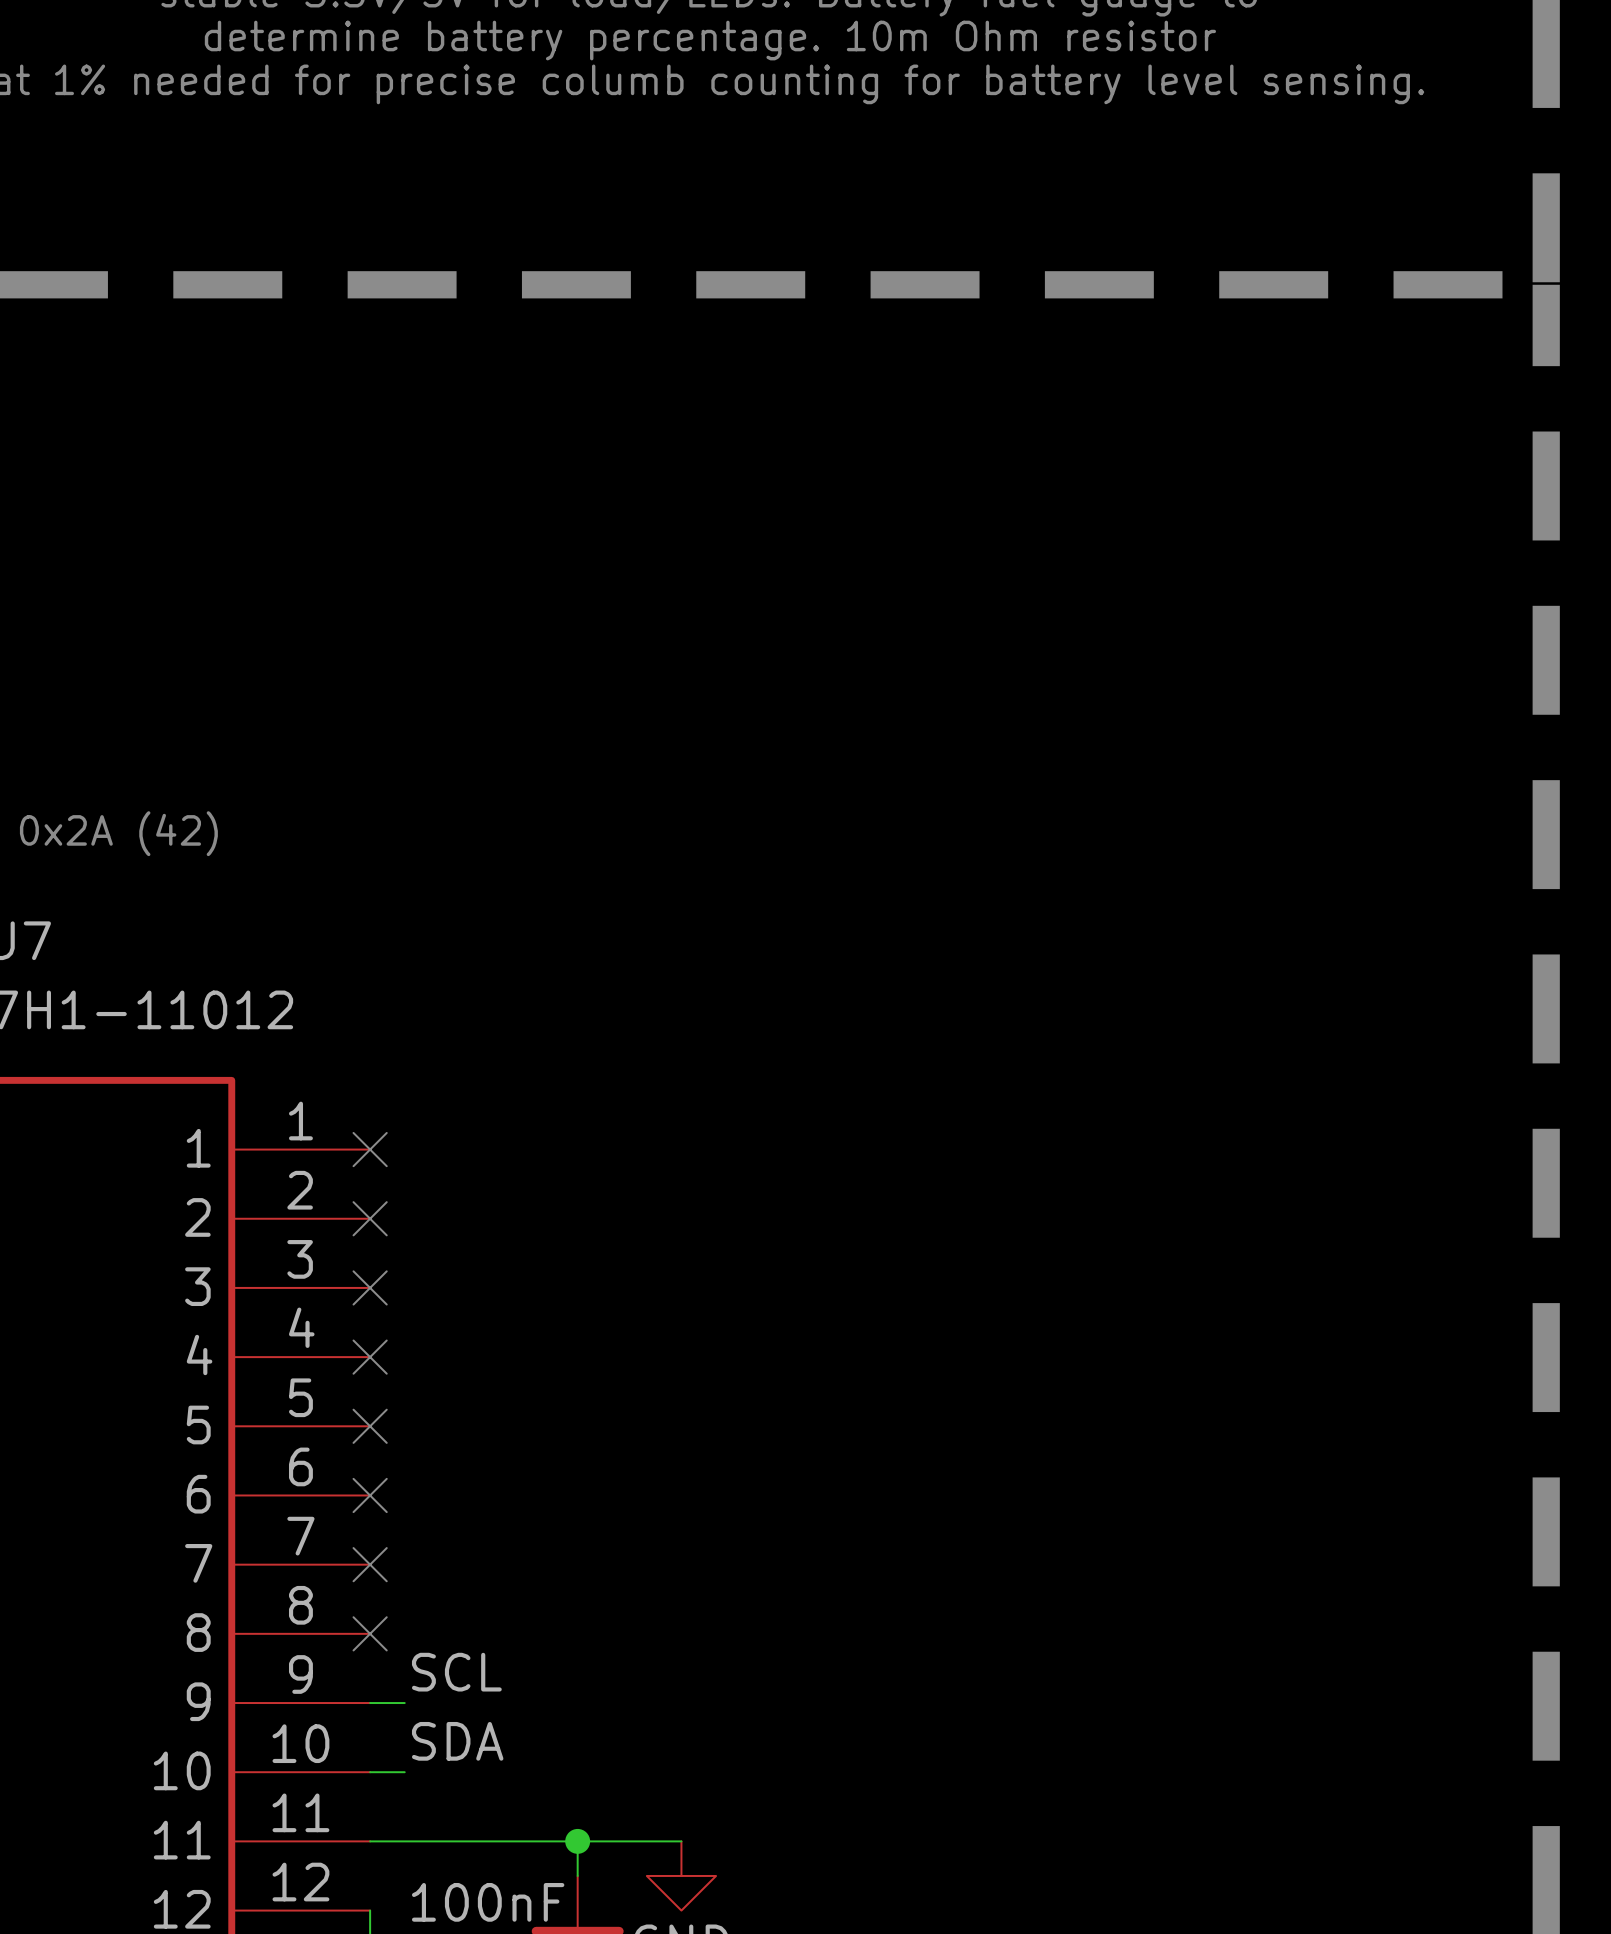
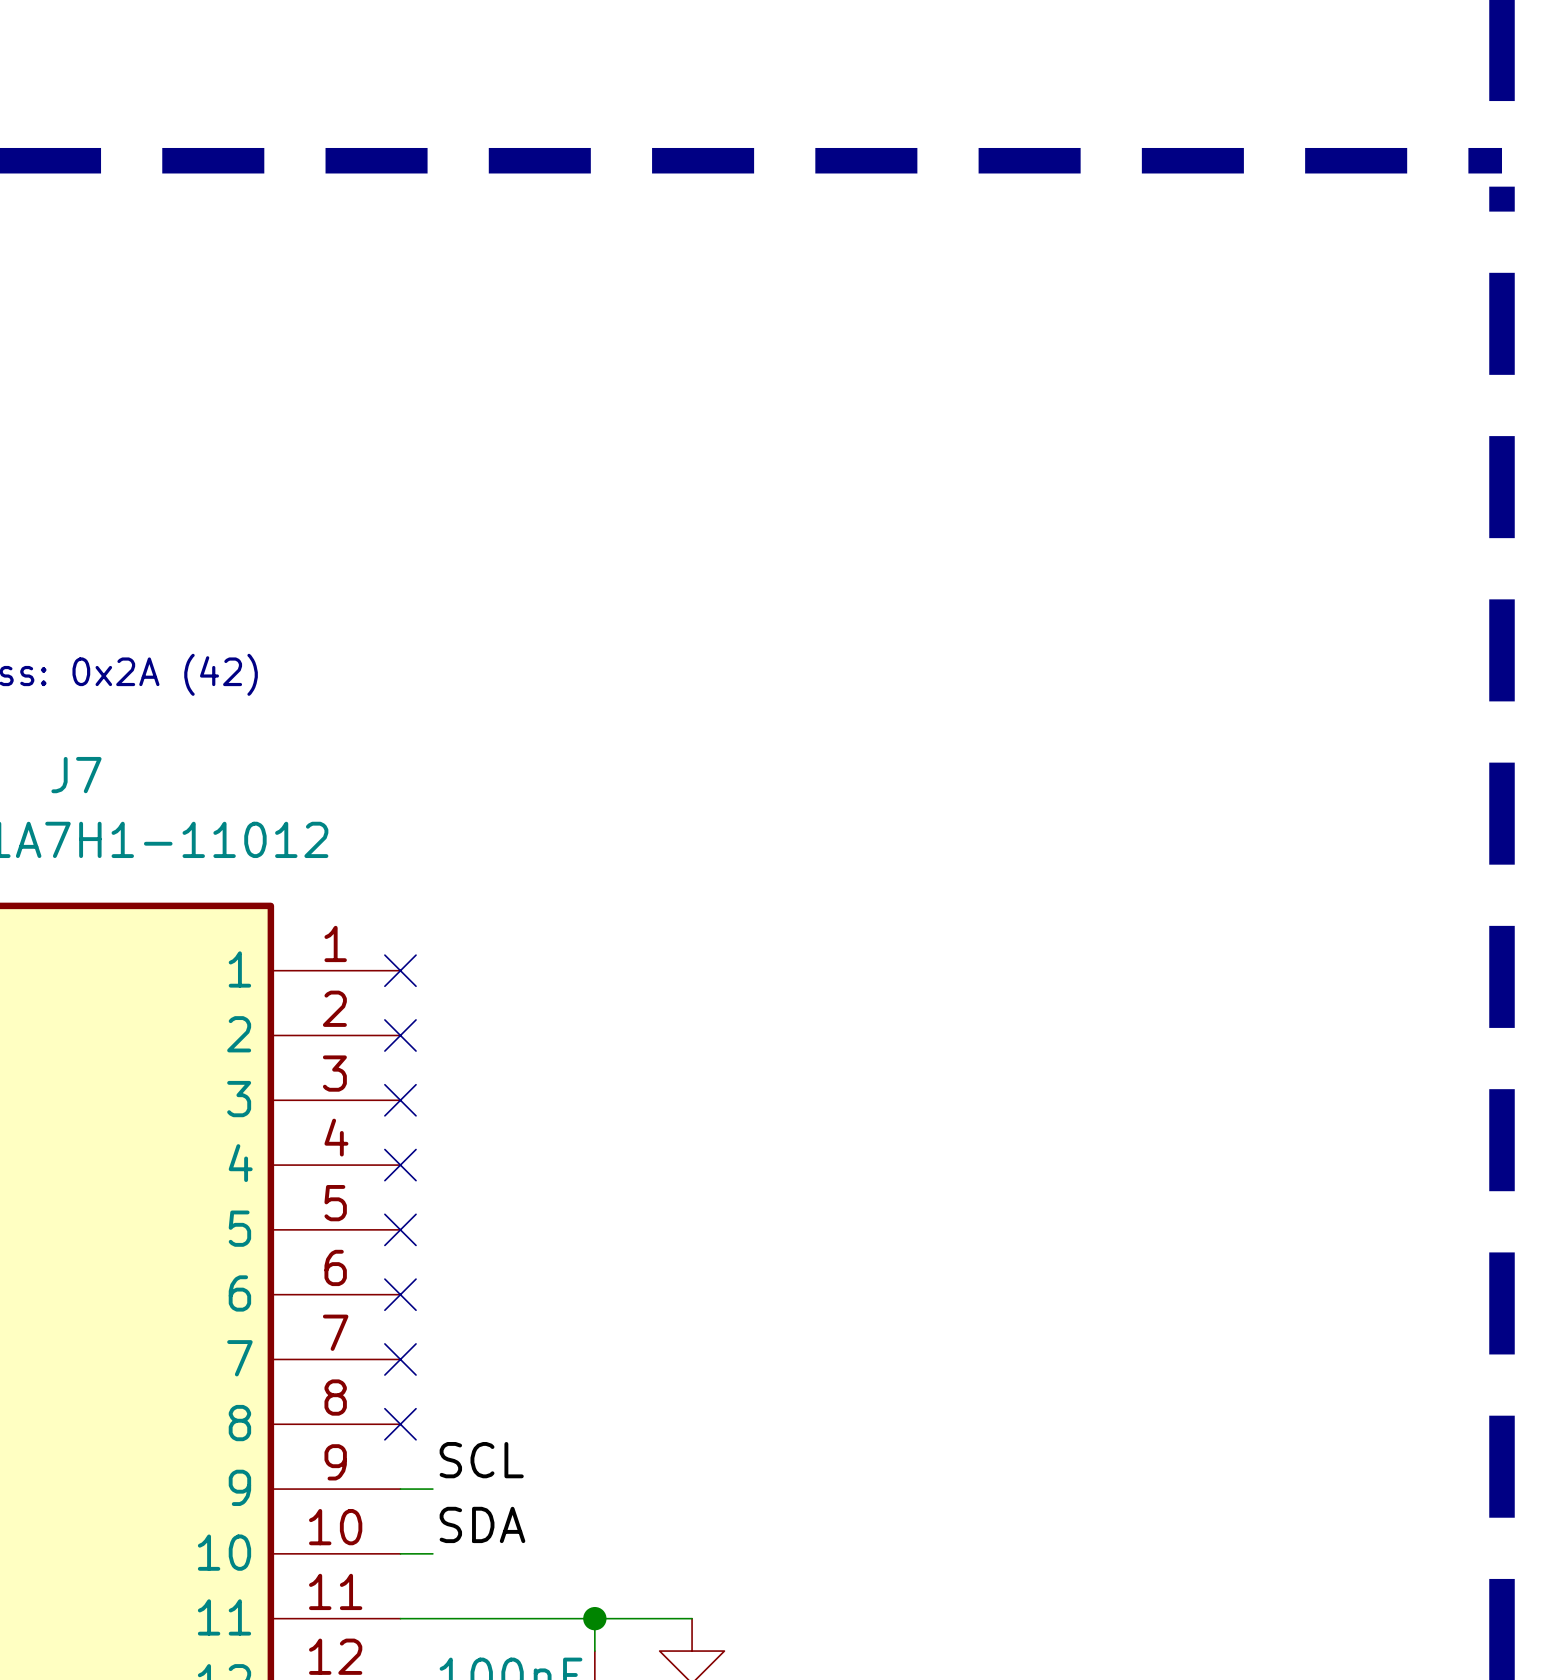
line: (1546, 284) (1546, 312) -> none

